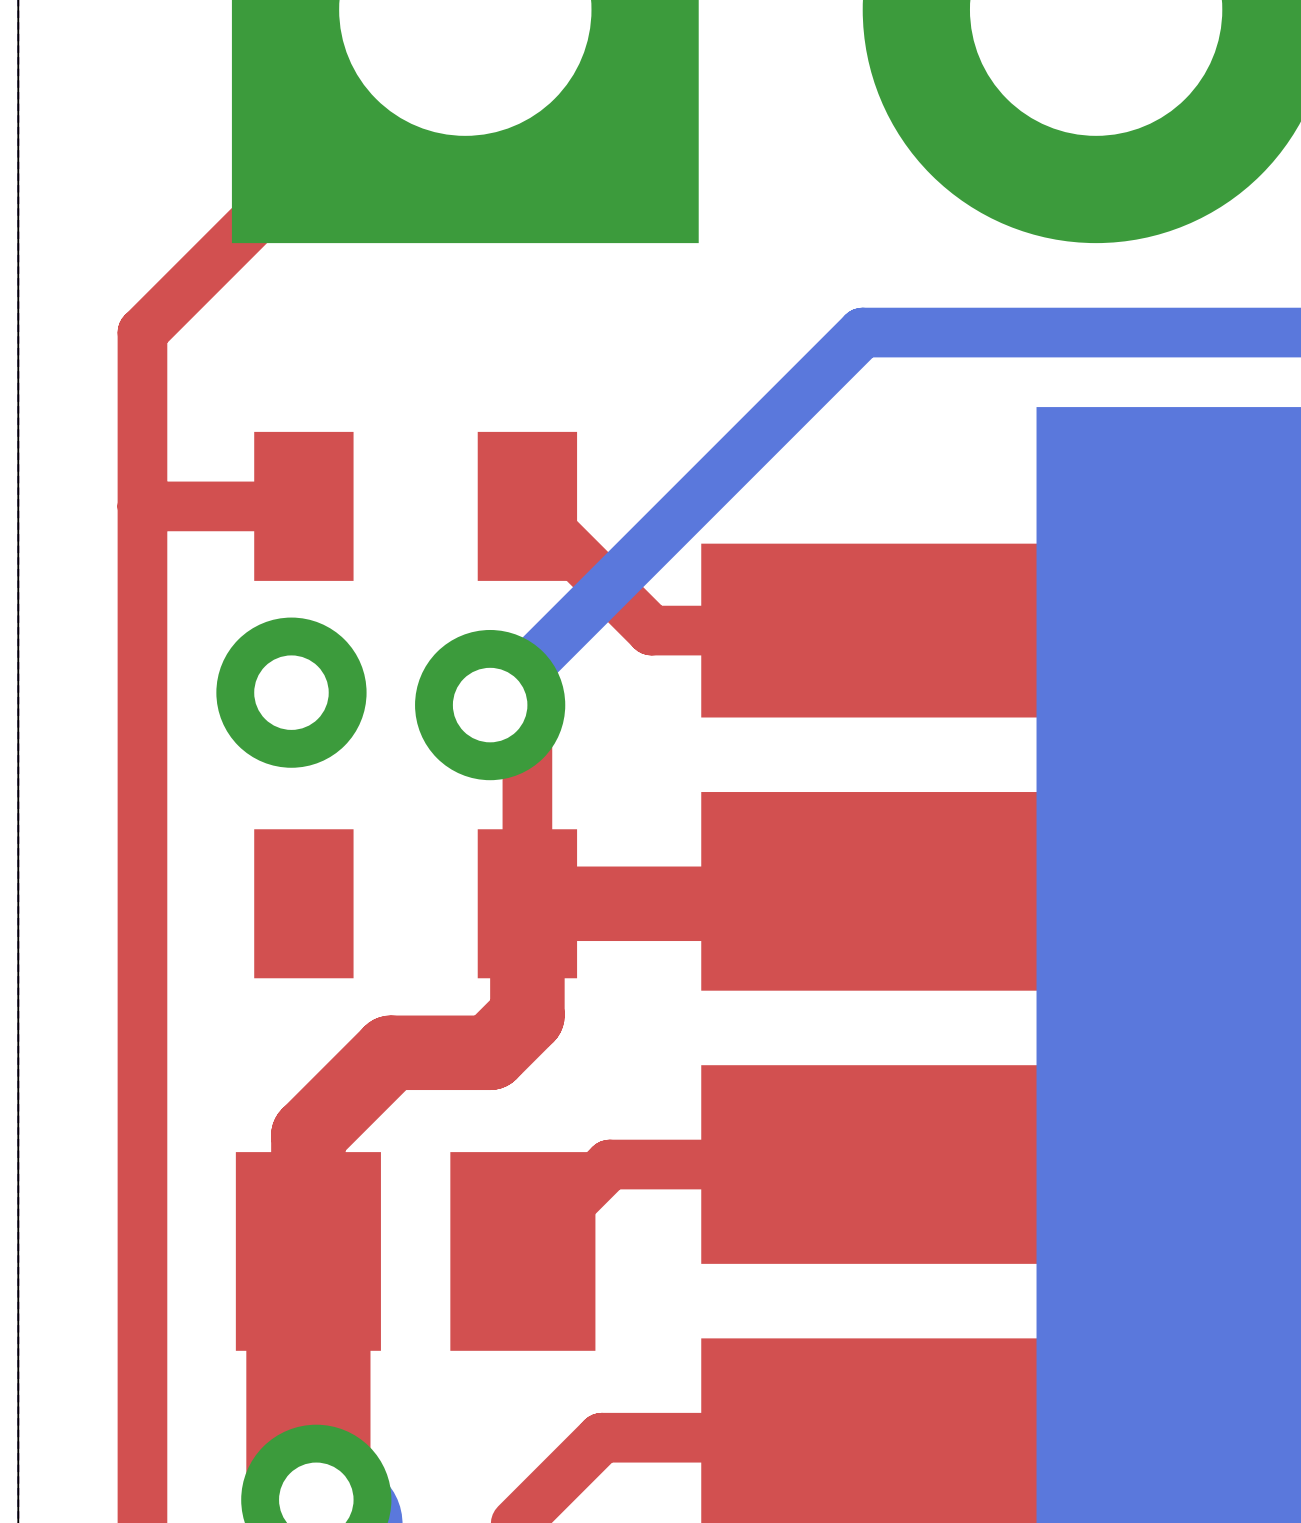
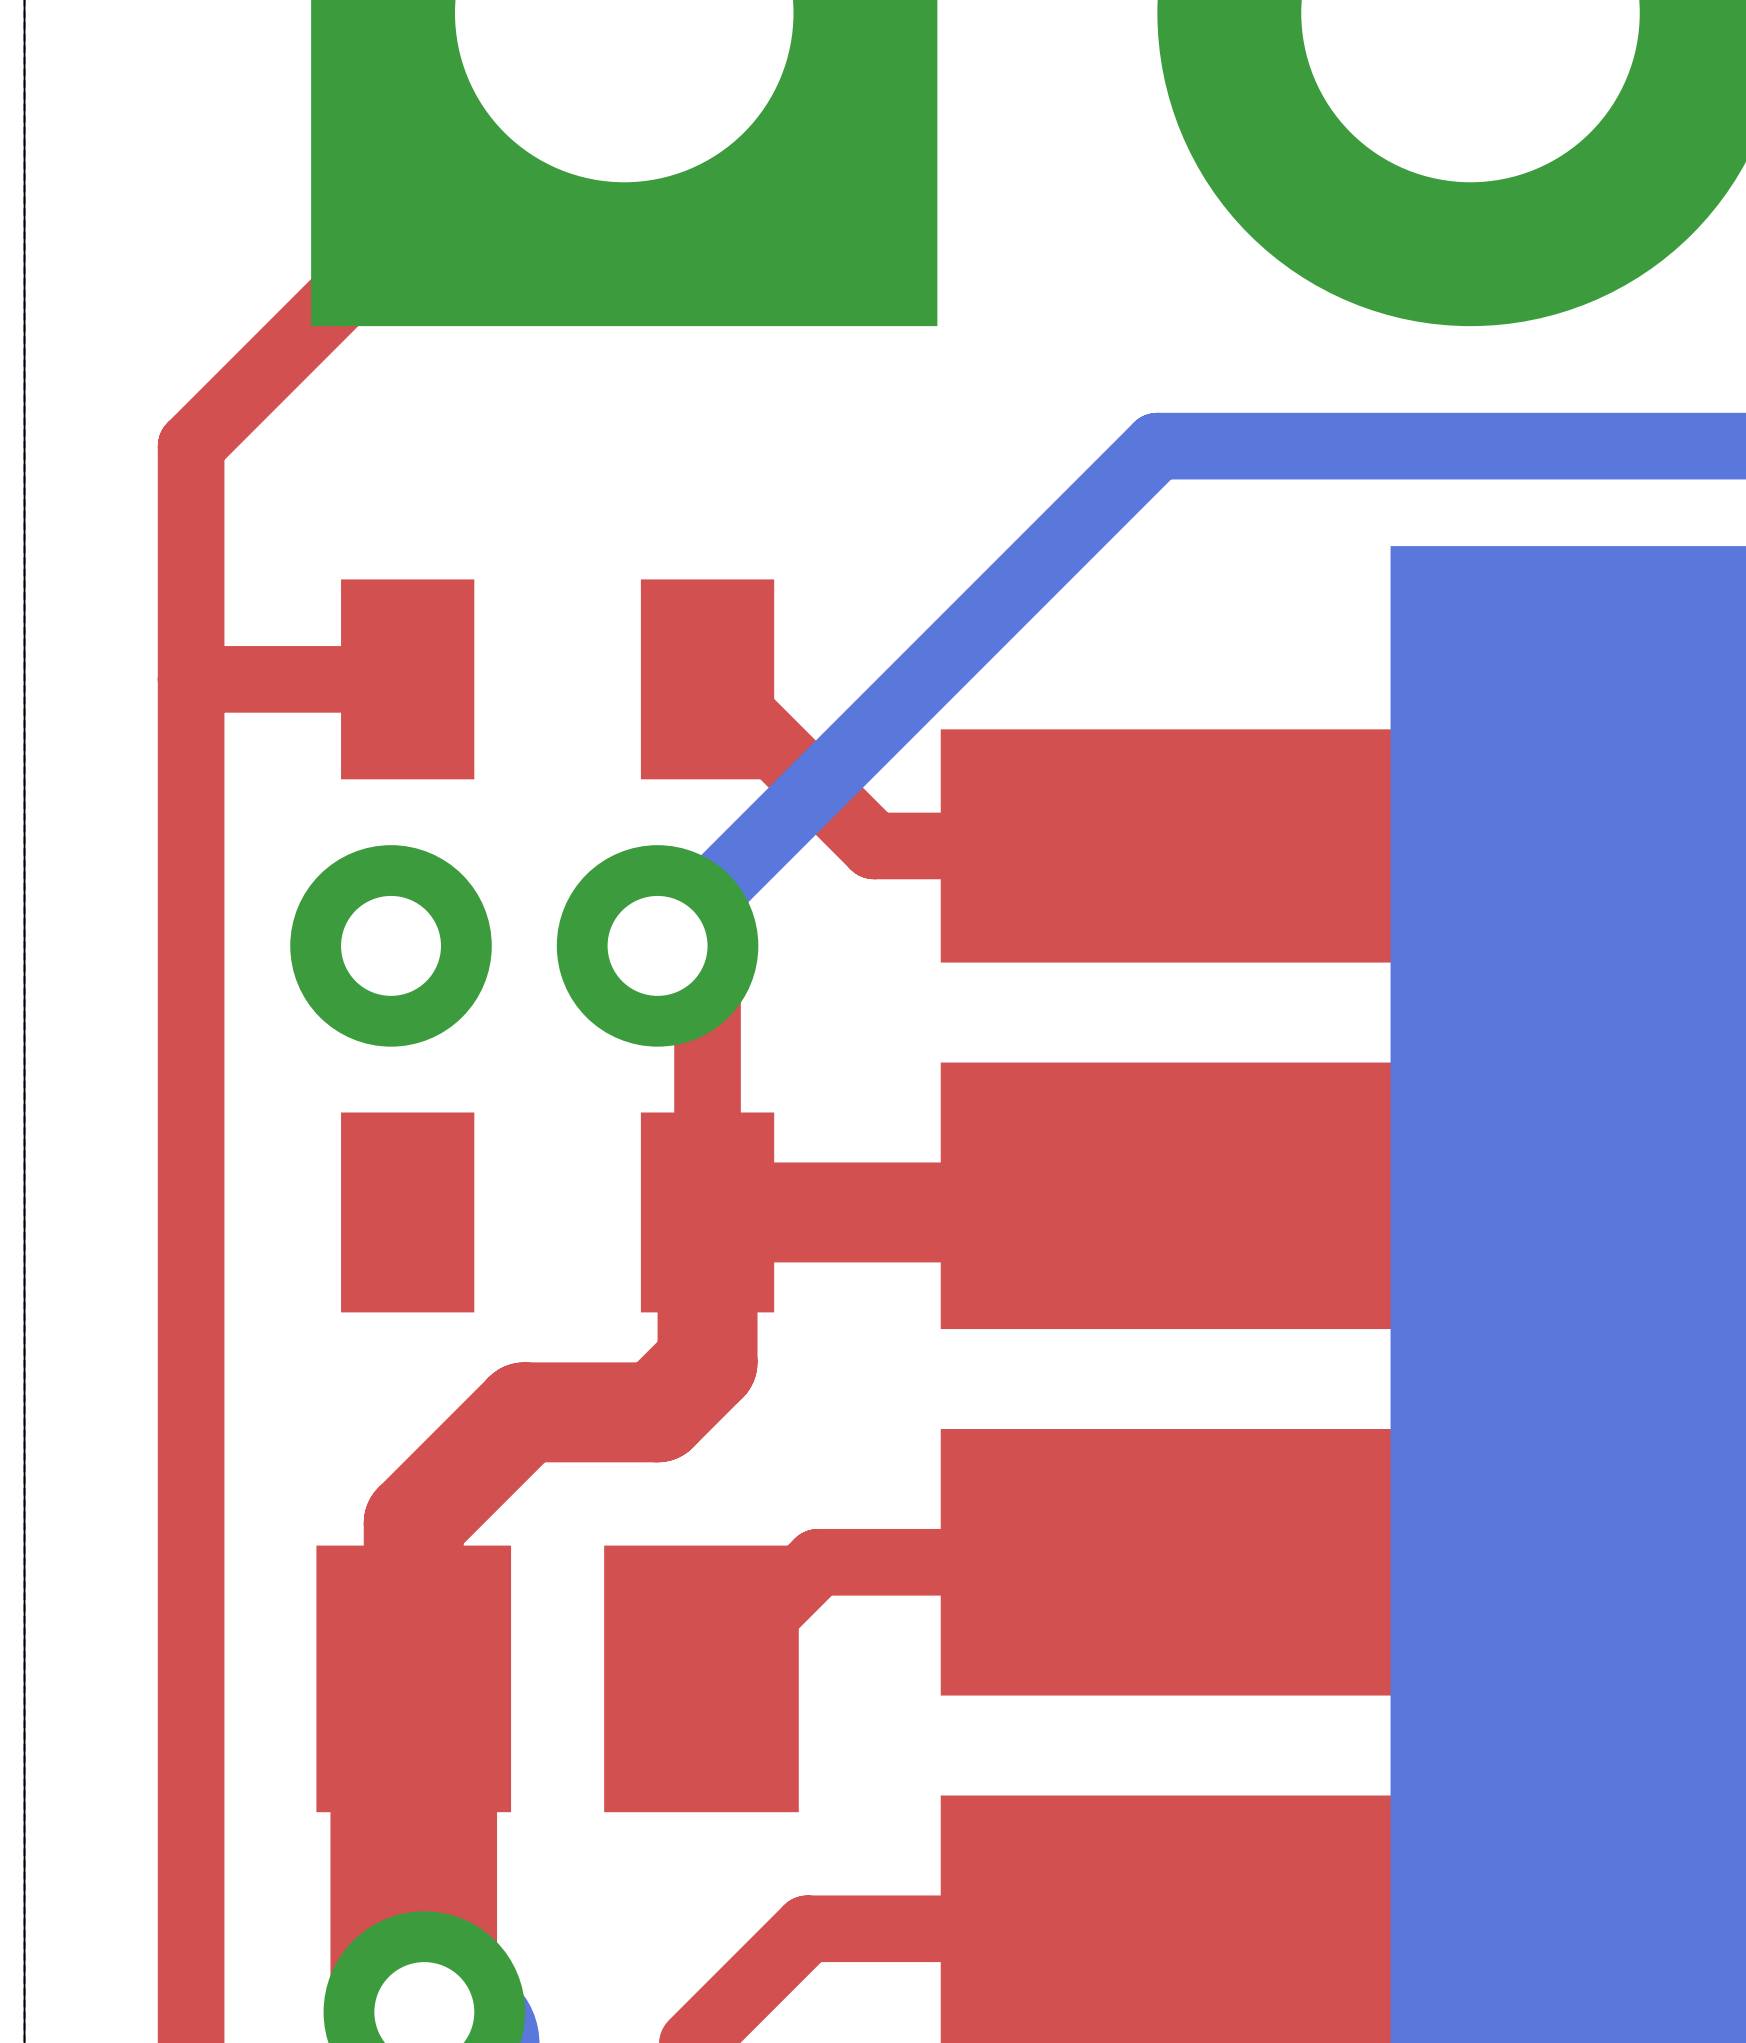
via position: (291, 692) -> (391, 945)

